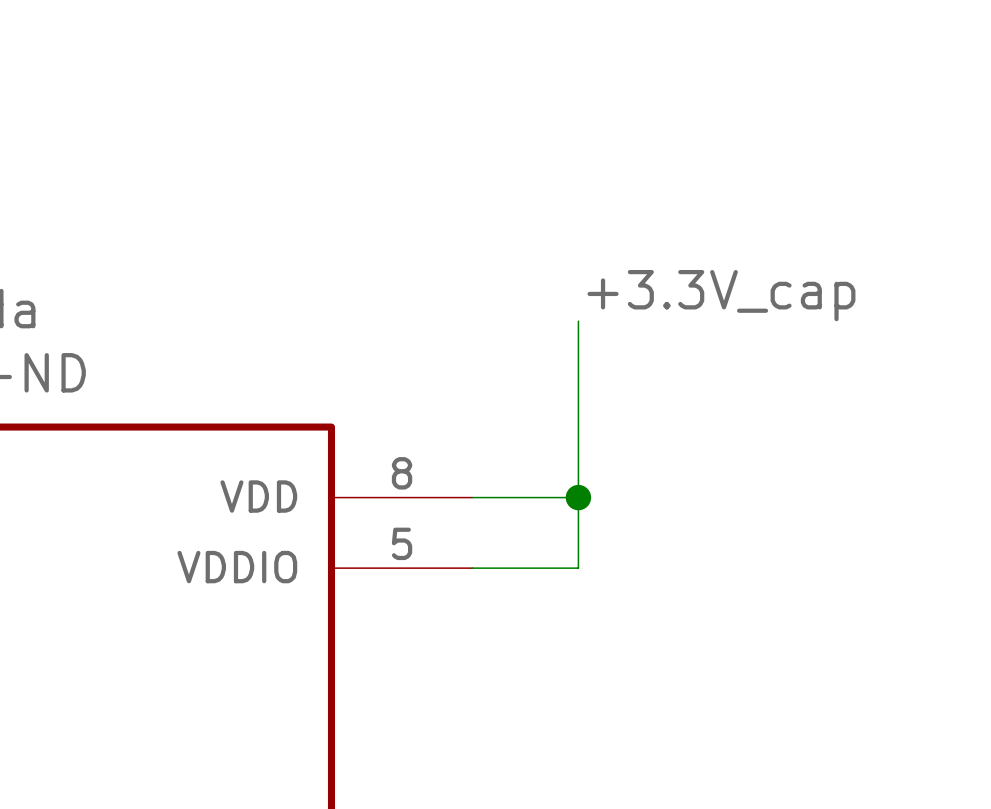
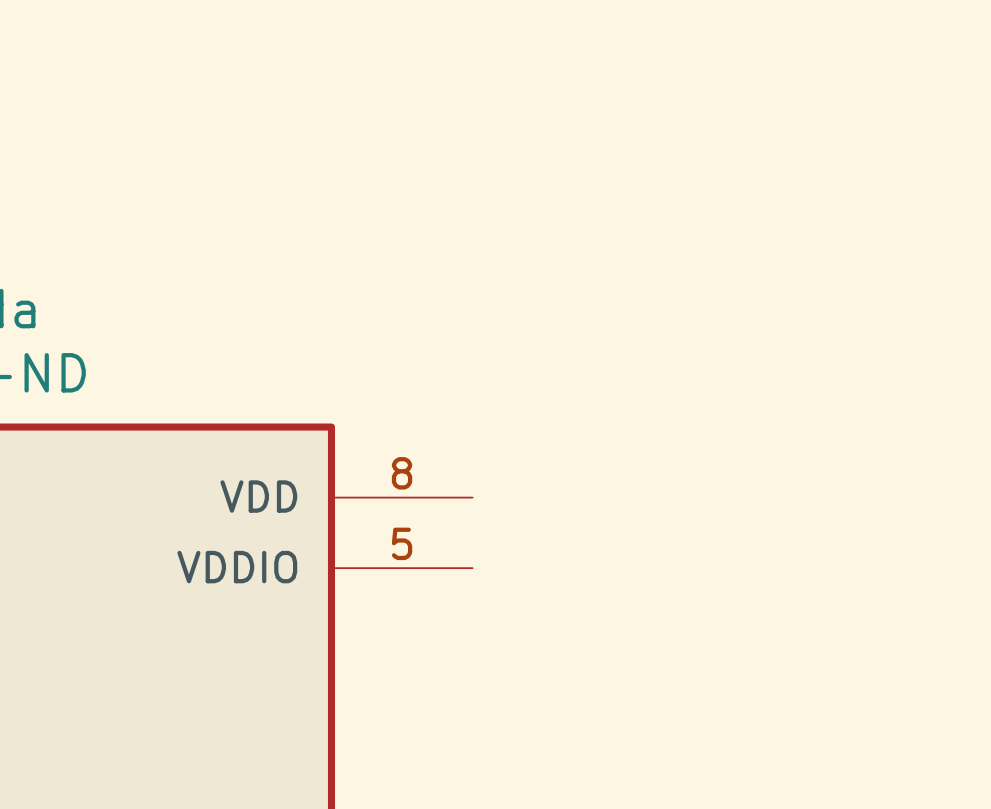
label: +3.3V_cap (721, 295) -> none
wire: (578, 321) (578, 568) (472, 568) -> none
wire: (472, 497) (578, 497) -> none
junction: (578, 497) -> none

